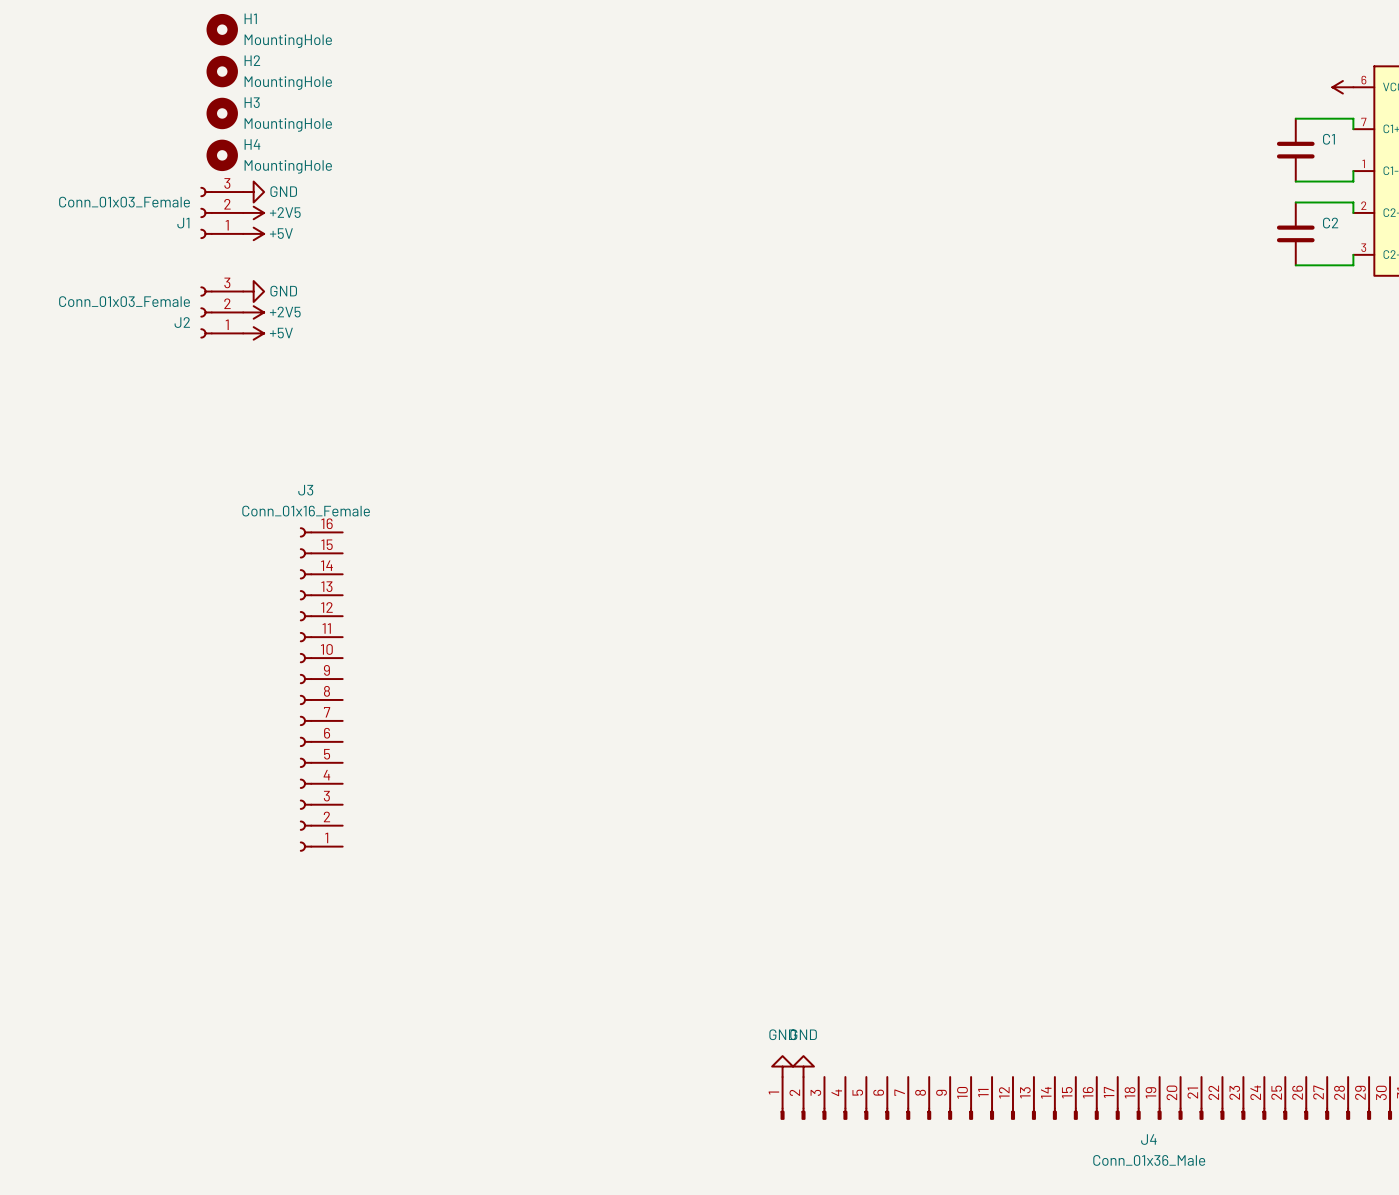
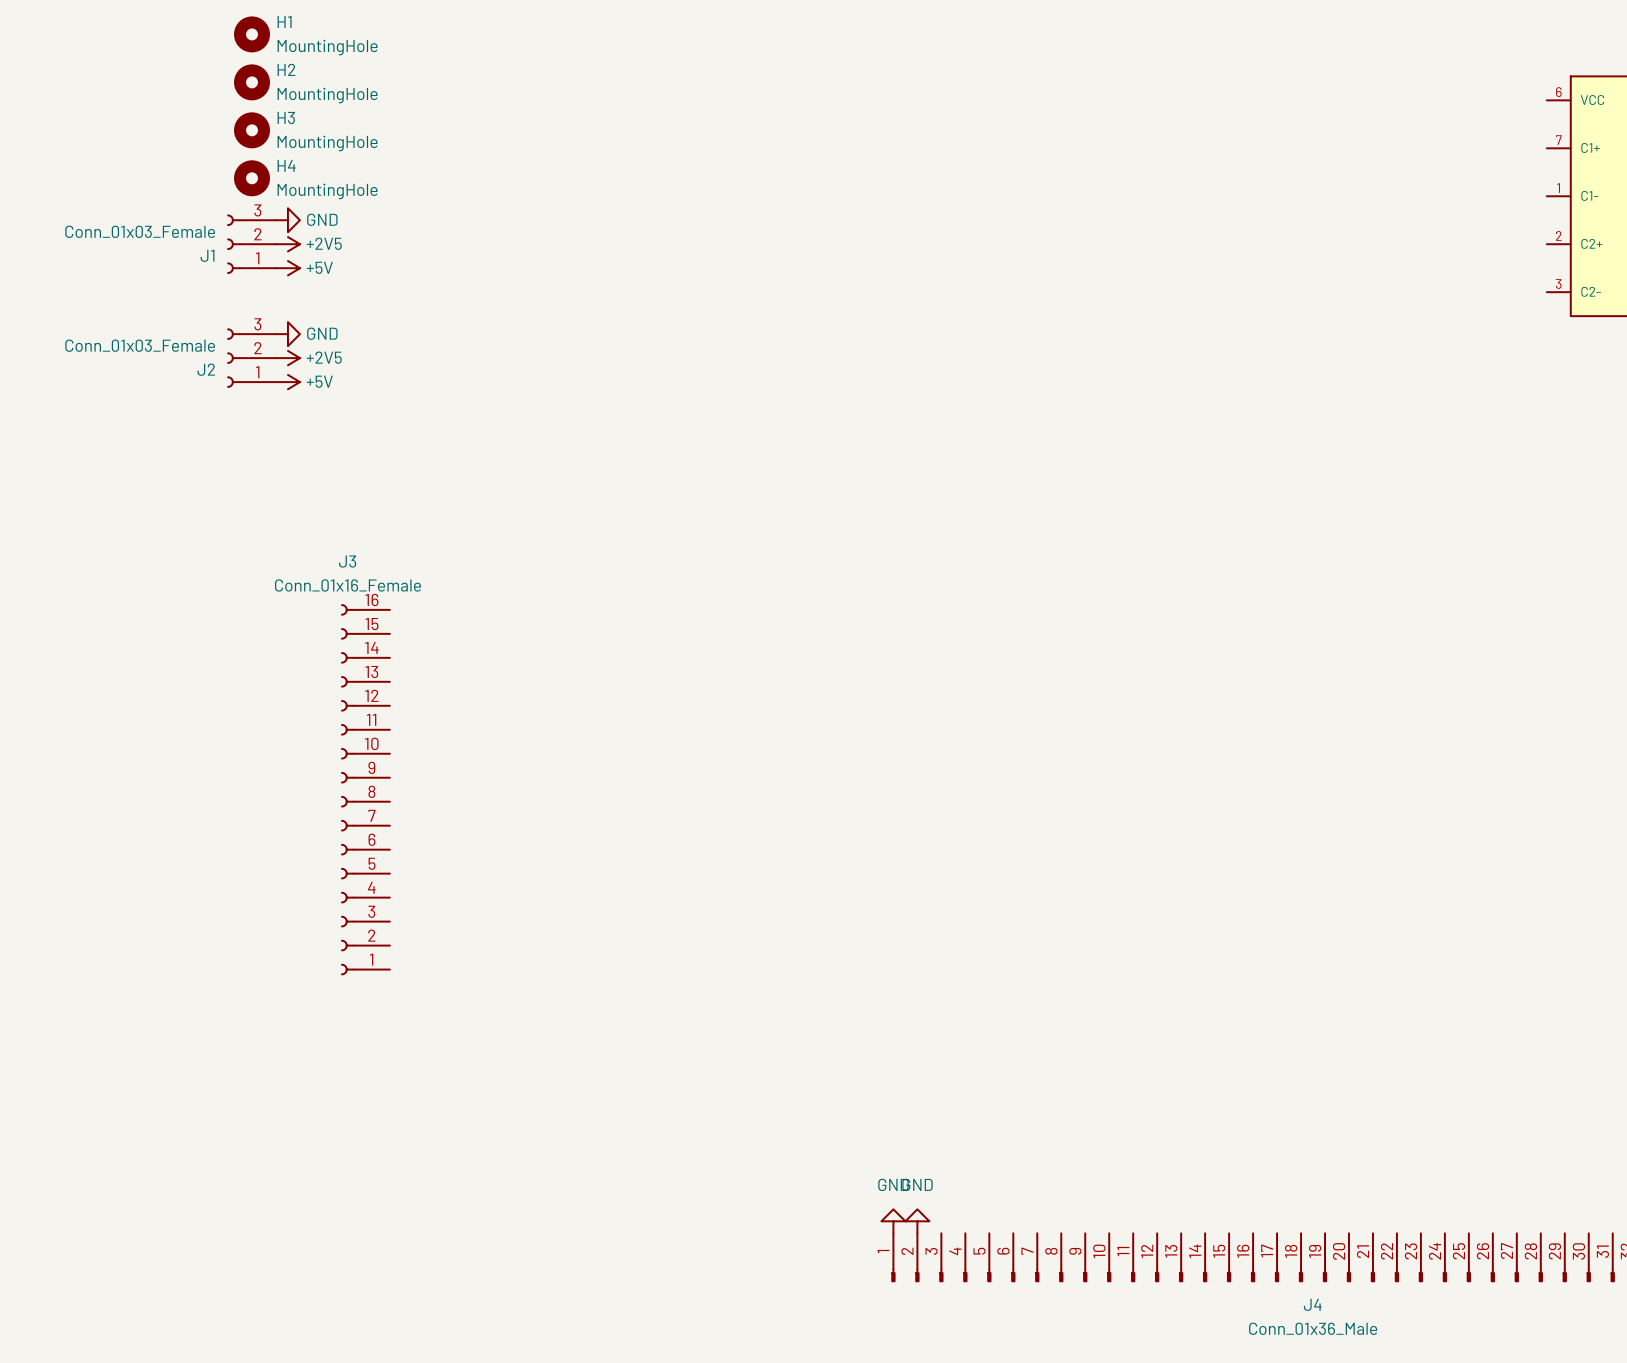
power symbol: (1342, 87) -> none
wire: (1295, 118) (1353, 118) (1353, 129) -> none
C1: (1295, 150) -> none
wire: (1353, 171) (1353, 181) (1295, 181) -> none
wire: (1295, 202) (1353, 202) (1353, 212) -> none
C2: (1295, 233) -> none
wire: (1353, 254) (1353, 265) (1295, 265) -> none

